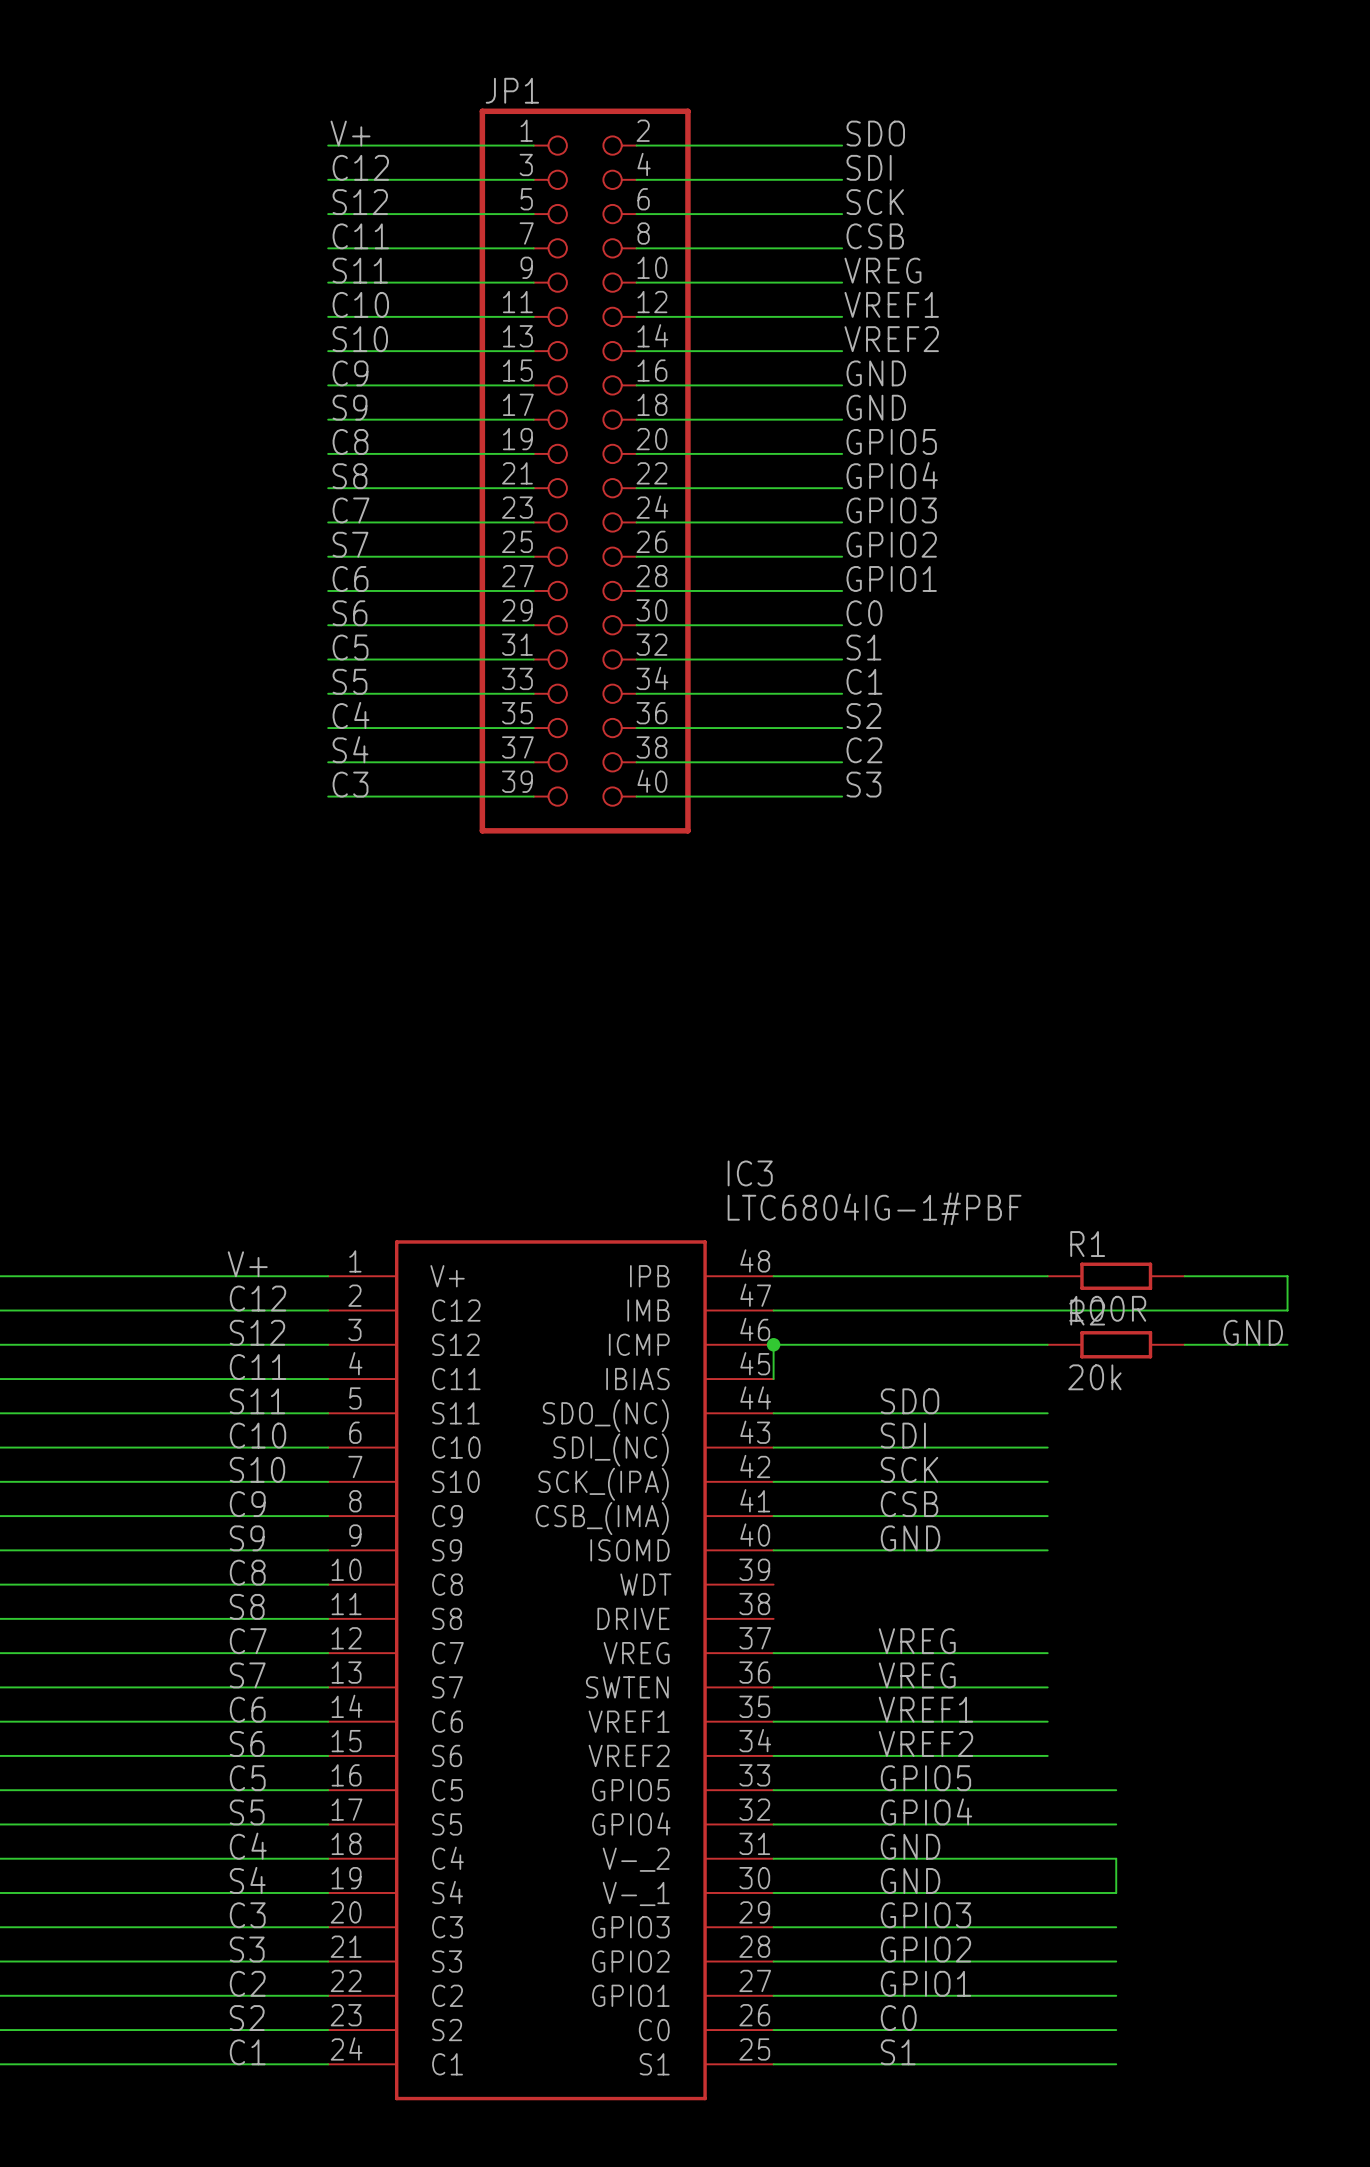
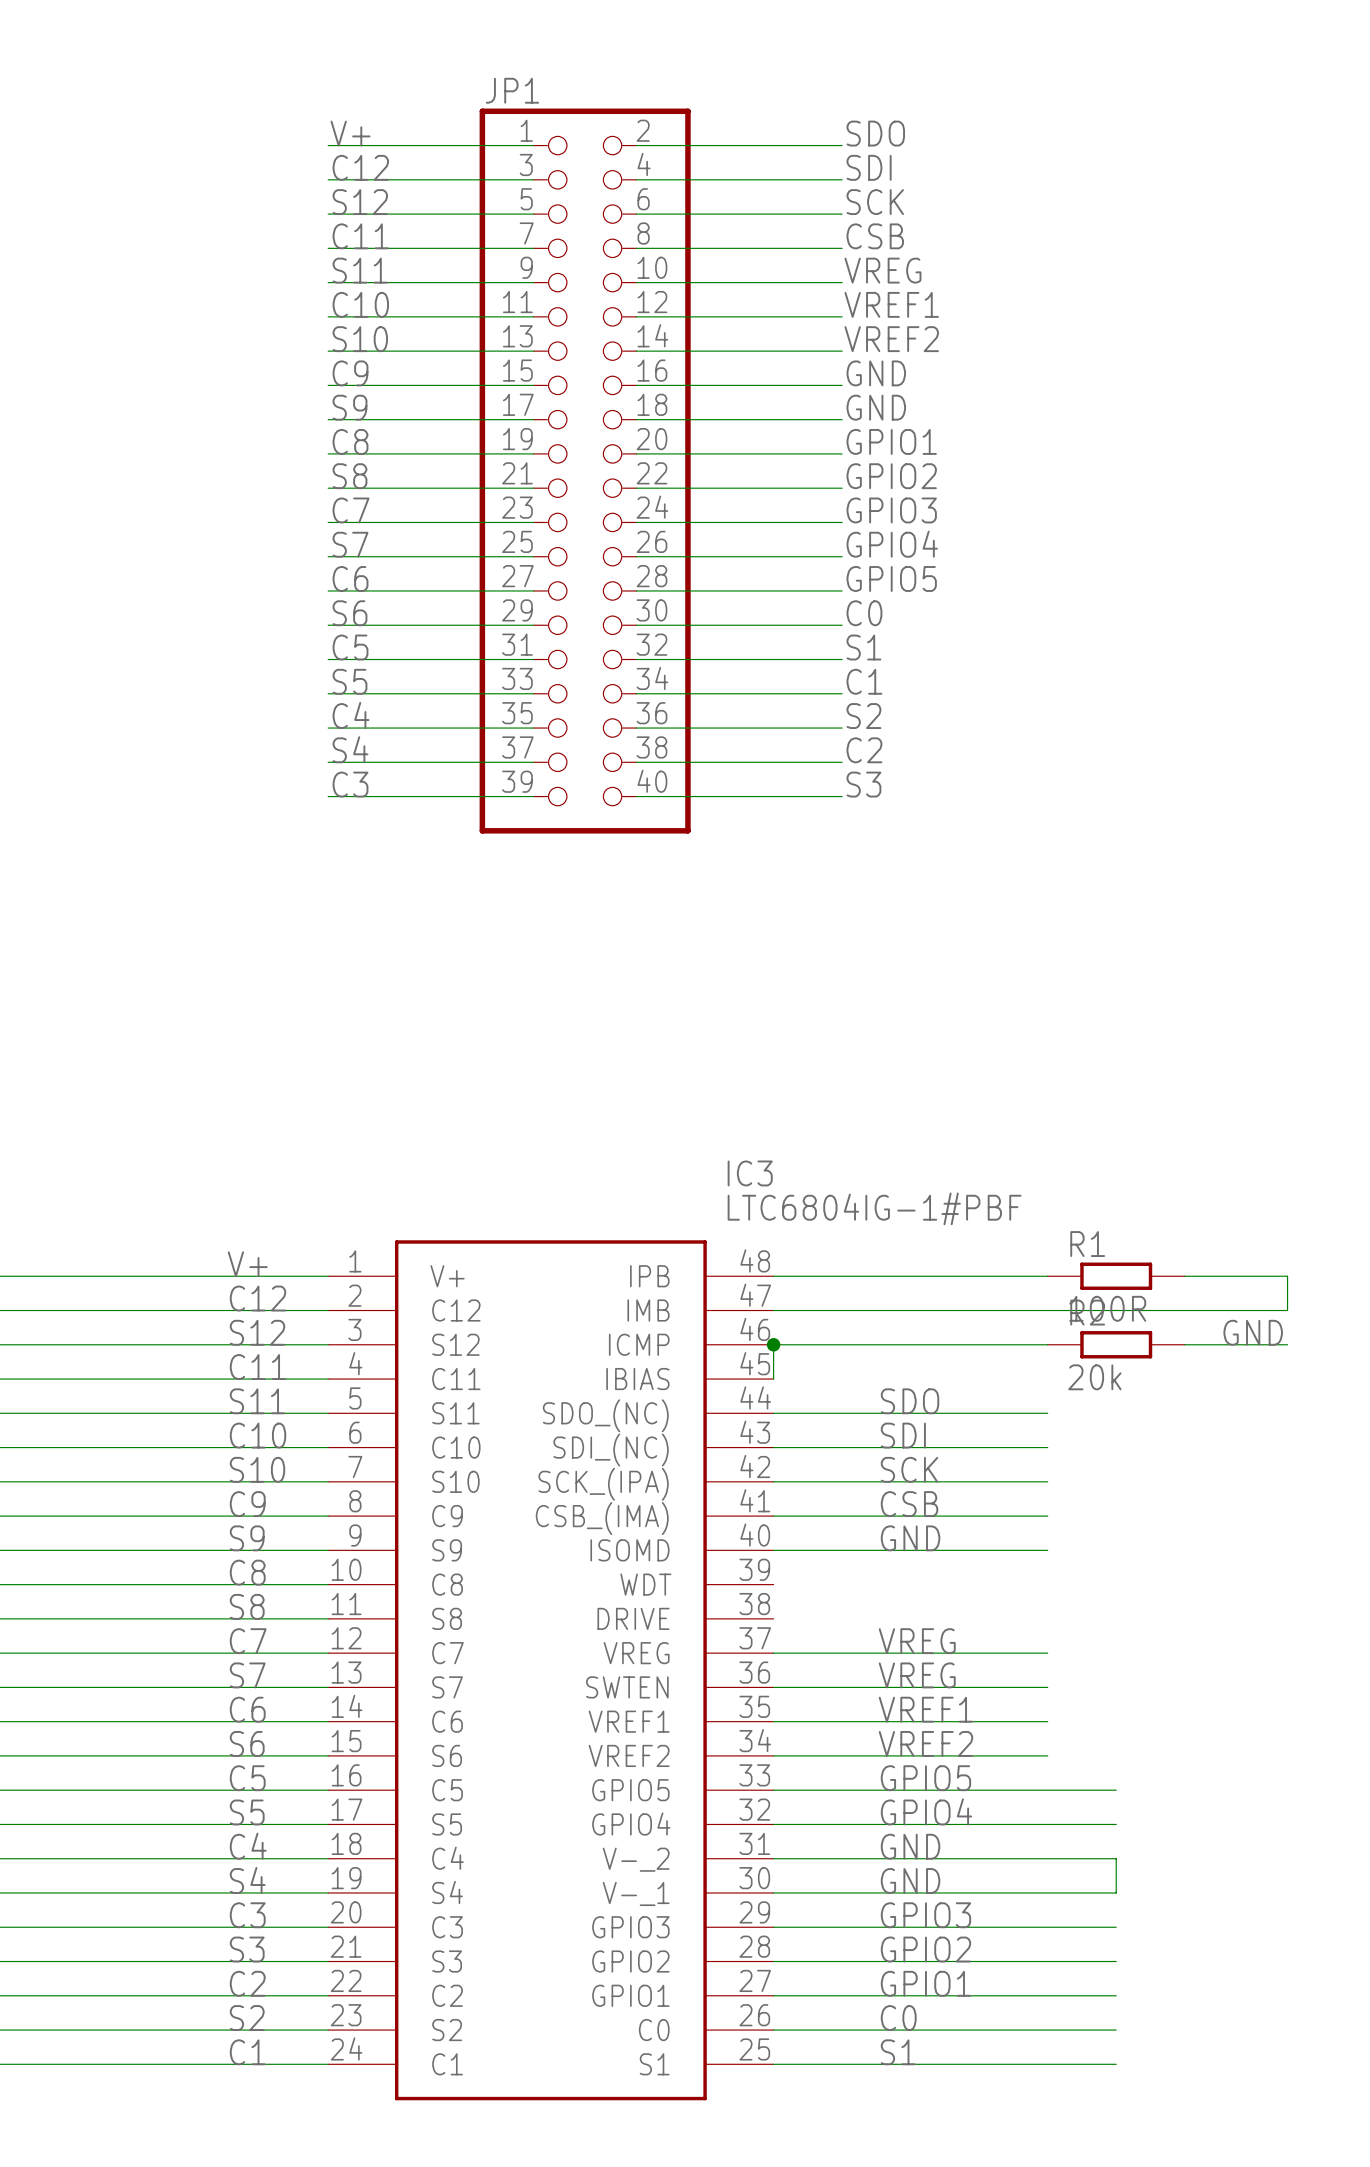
label: GPIO5 (891, 441) -> GPIO1 (891, 441)
label: GPIO4 (892, 475) -> GPIO2 (891, 476)
label: GPIO2 (891, 544) -> GPIO4 (892, 544)
label: GPIO1 (891, 578) -> GPIO5 (891, 578)

